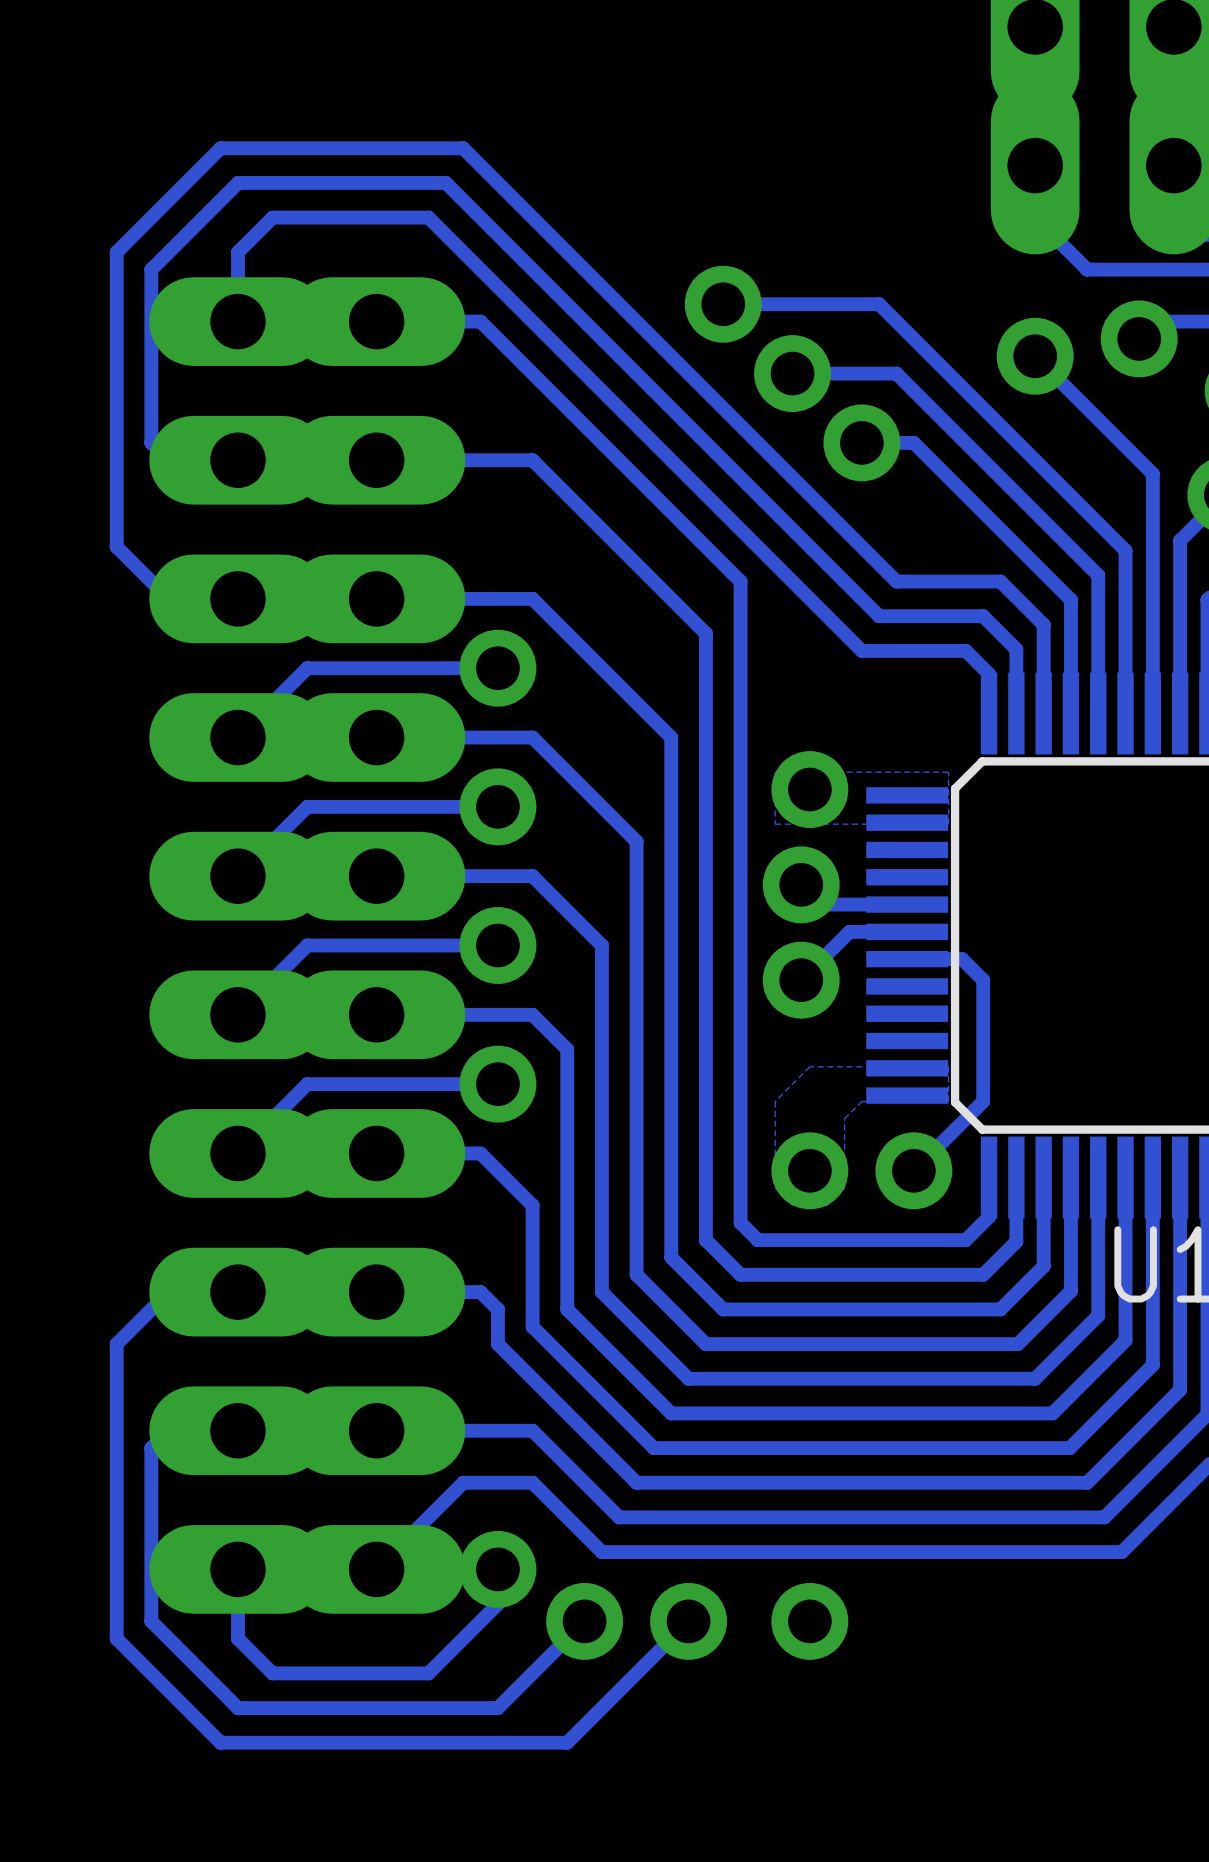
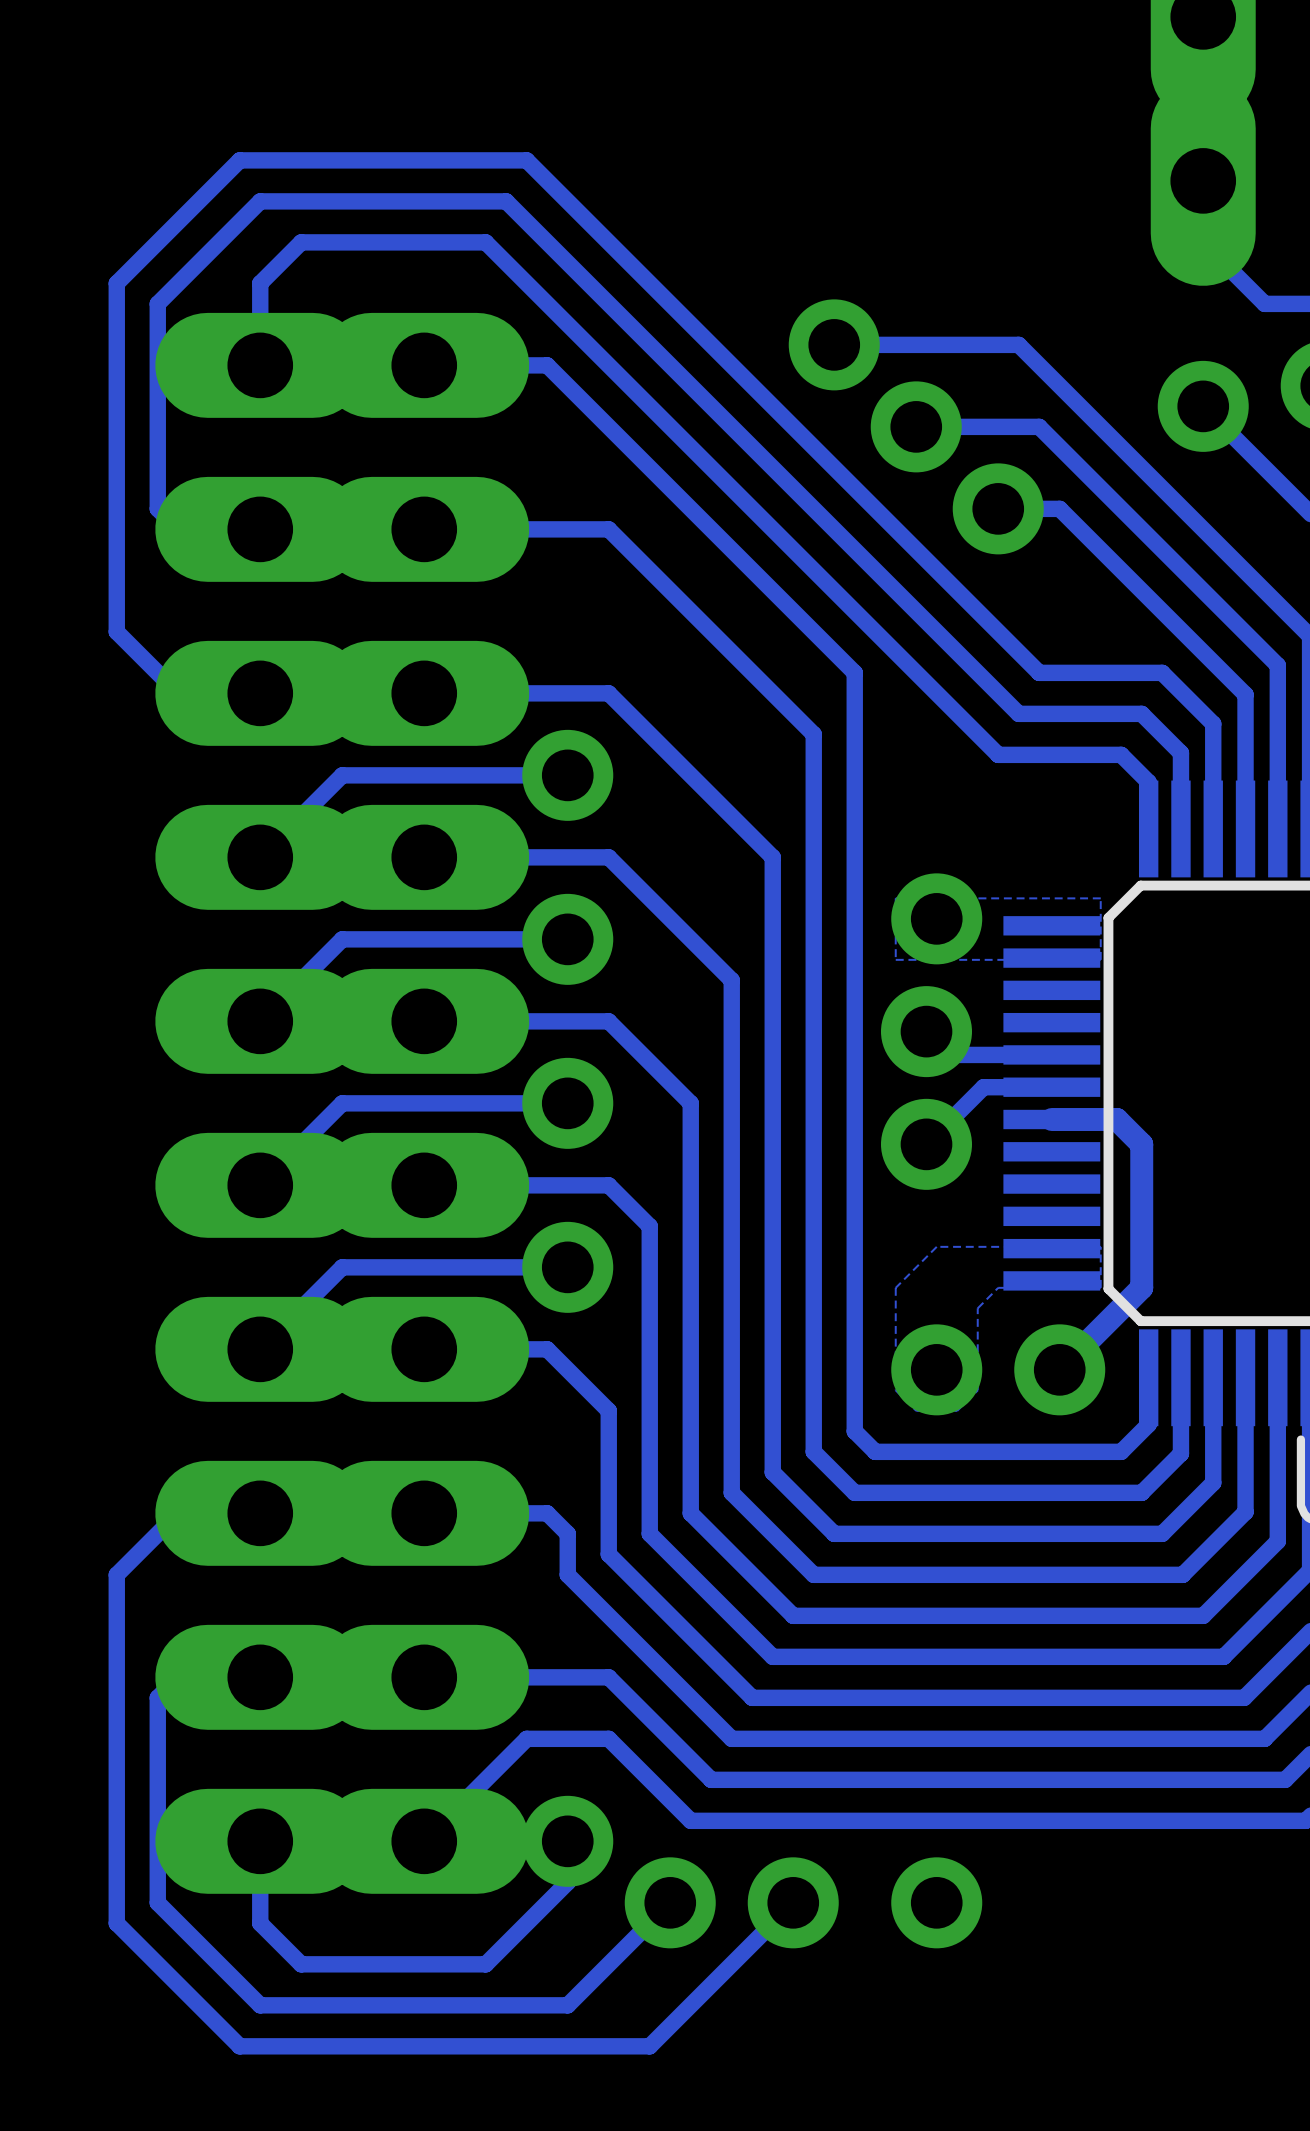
track width: thin (907, 959) (962, 959) (983, 980) (983, 1101) (913, 1170) -> thick (1051, 1119) (1116, 1119) (1141, 1144) (1141, 1287) (1059, 1369)

